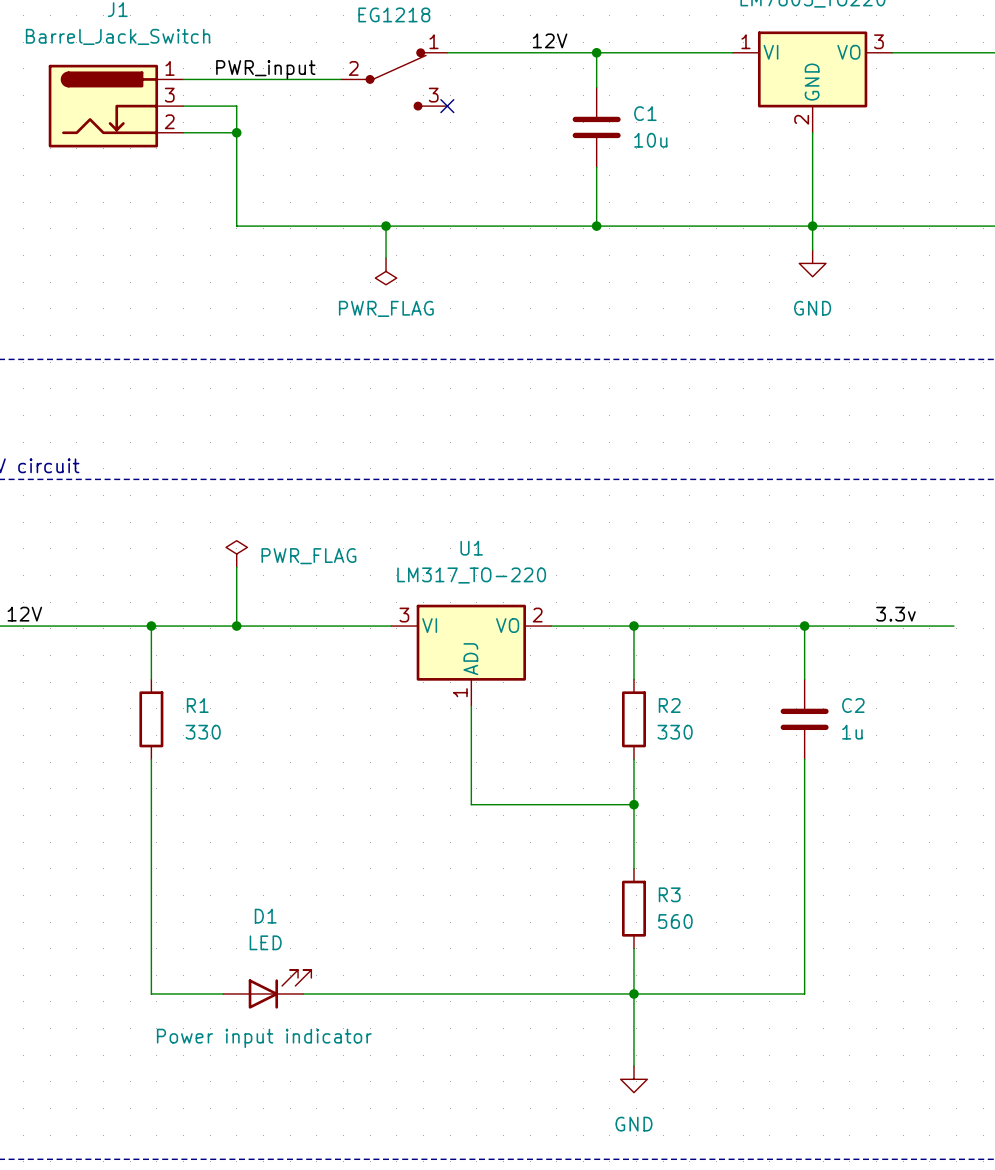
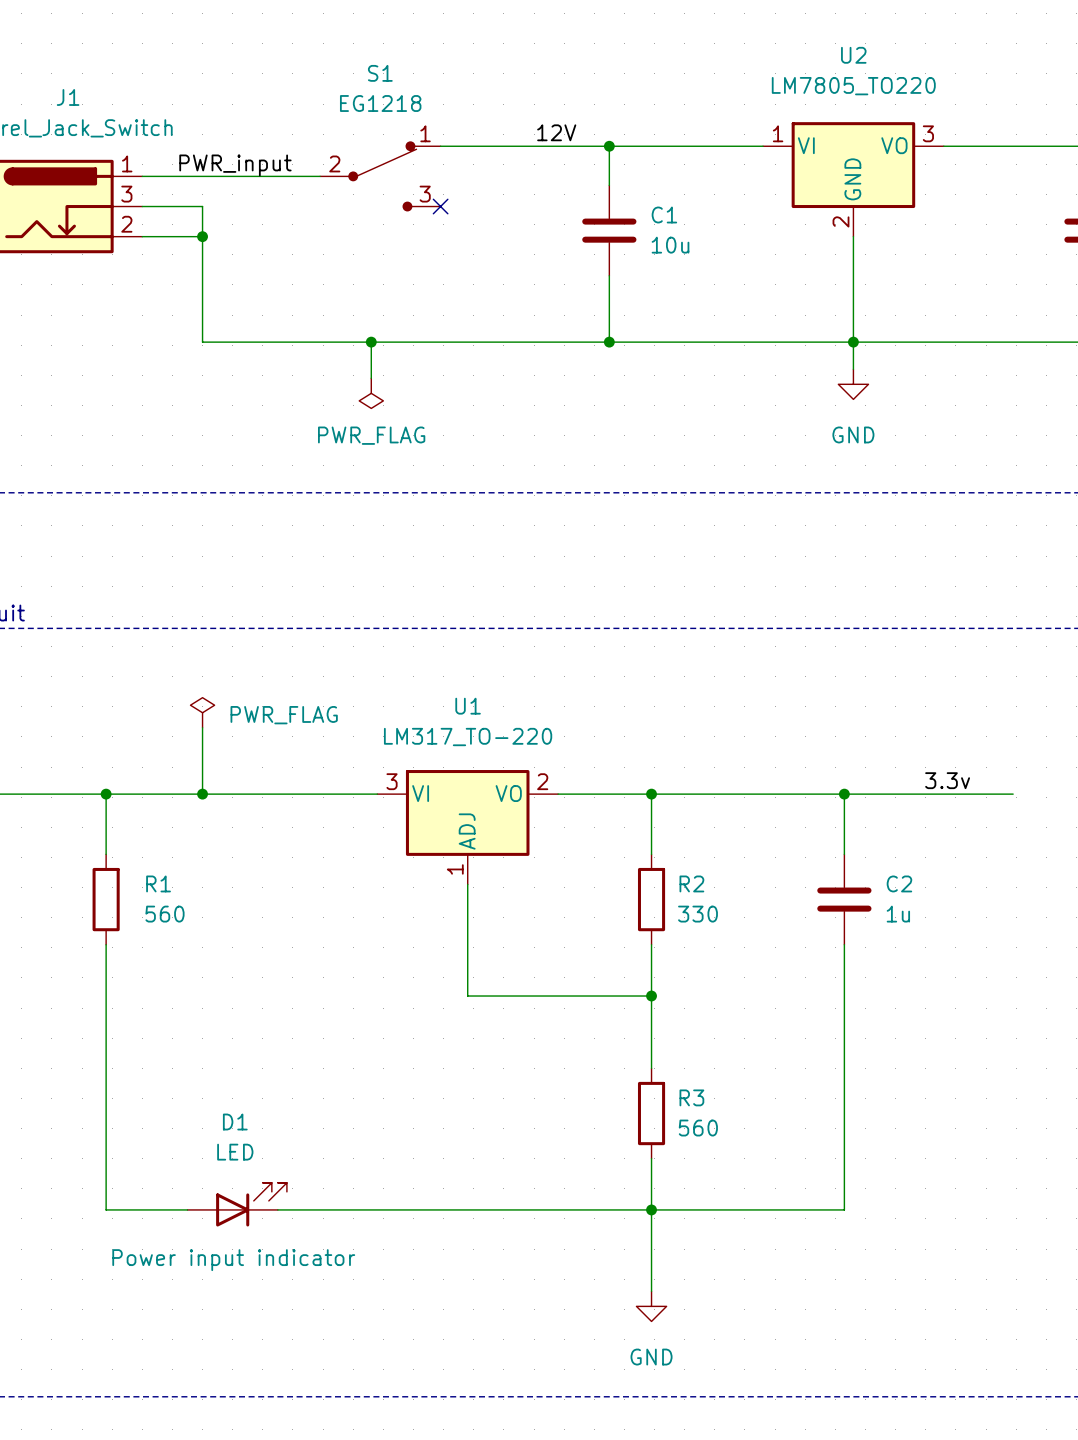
R1 value: 330 (203, 732) -> 560 (164, 914)

